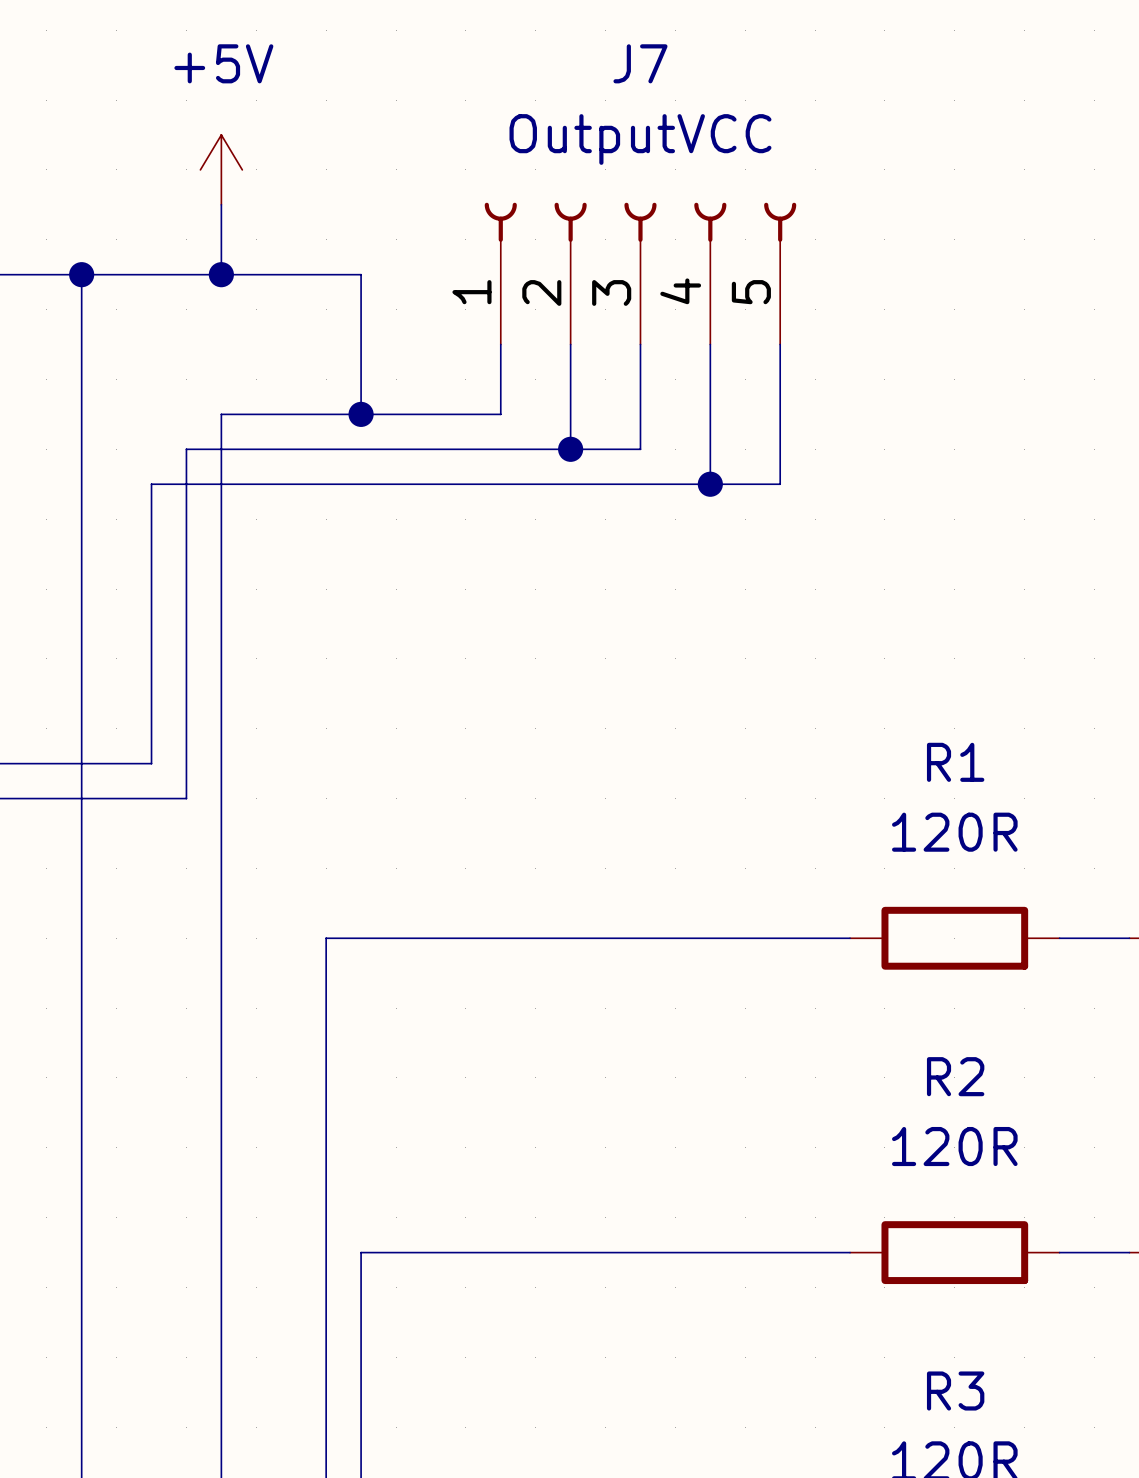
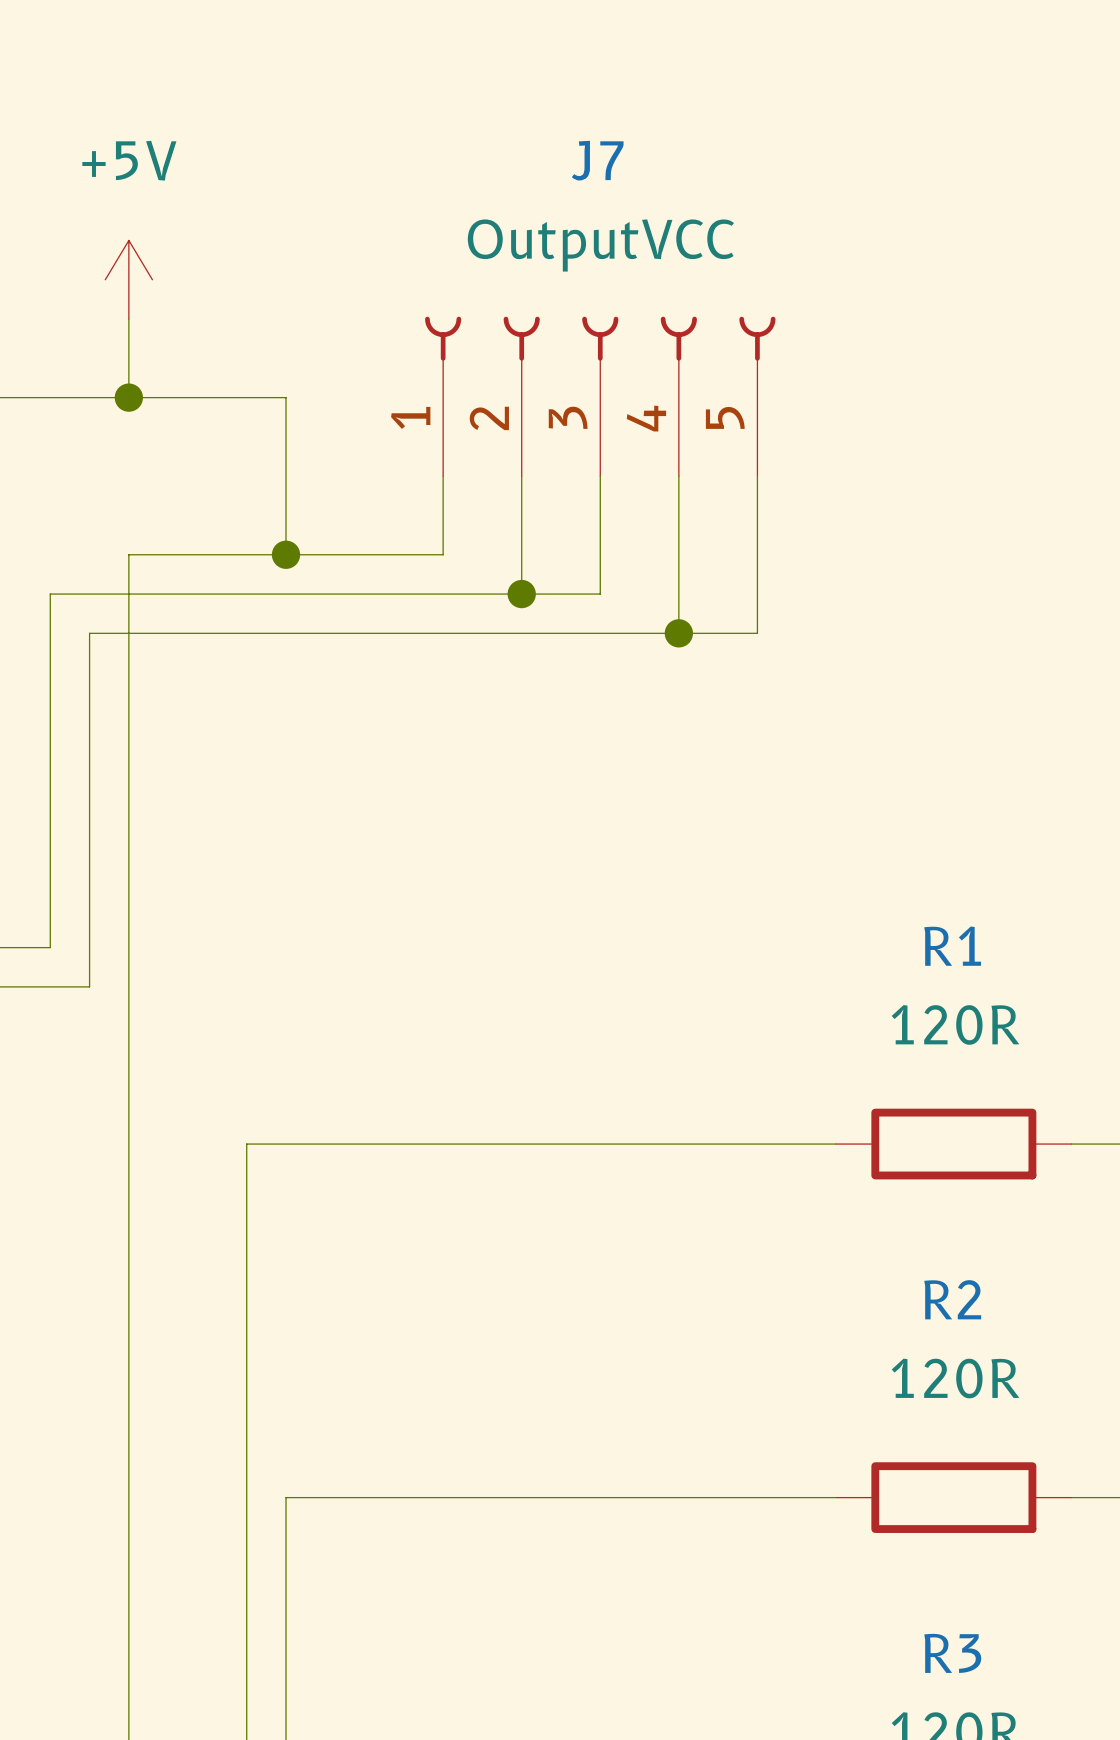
wire: (186, 449) (186, 484) (151, 484) -> (89, 594) (50, 594) (50, 633)

